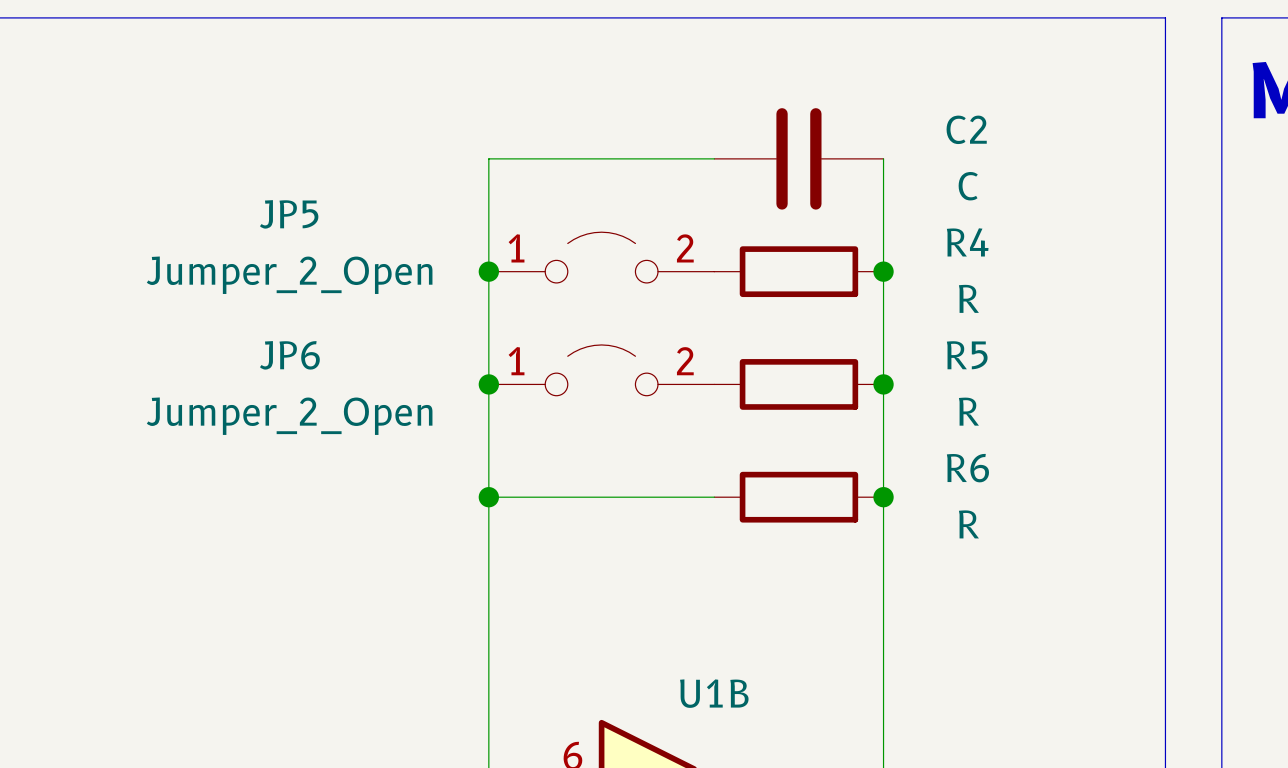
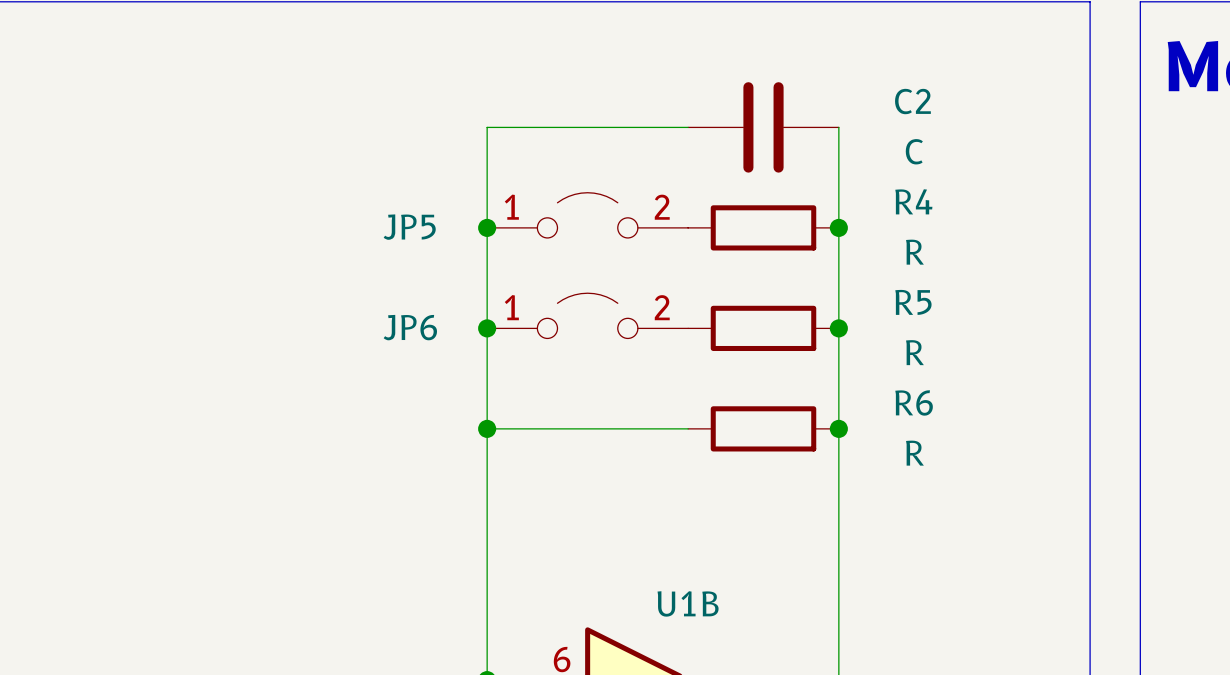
JP5 name position: JP5 (289, 214) -> JP5 (409, 227)
JP5 value: Jumper_2_Open (289, 275) -> none
JP6 name position: JP6 (289, 355) -> JP6 (410, 327)
JP6 value: Jumper_2_Open (289, 416) -> none

